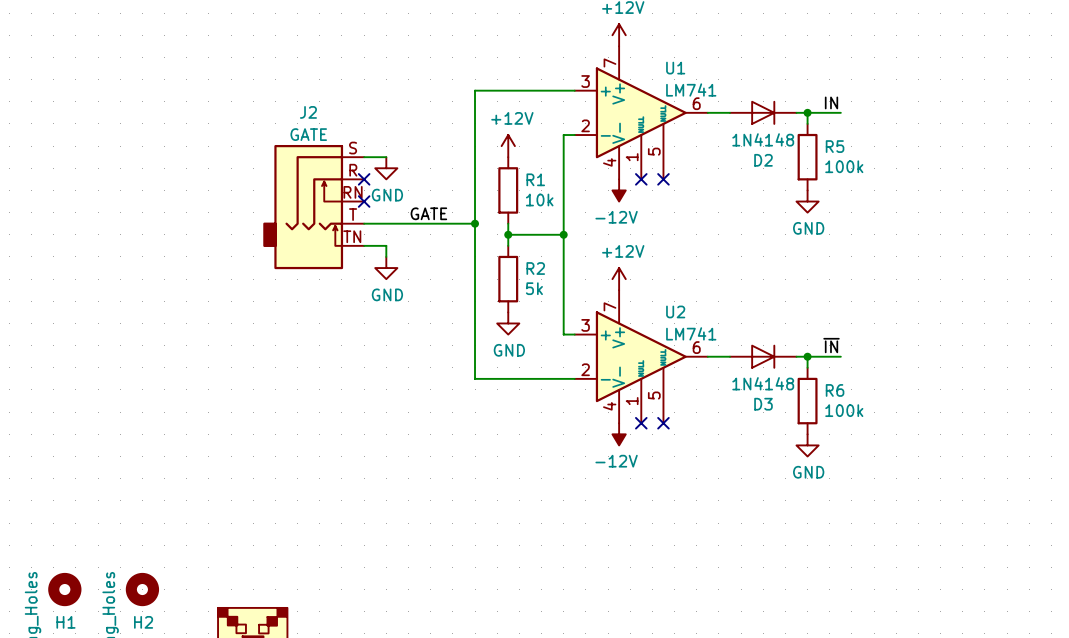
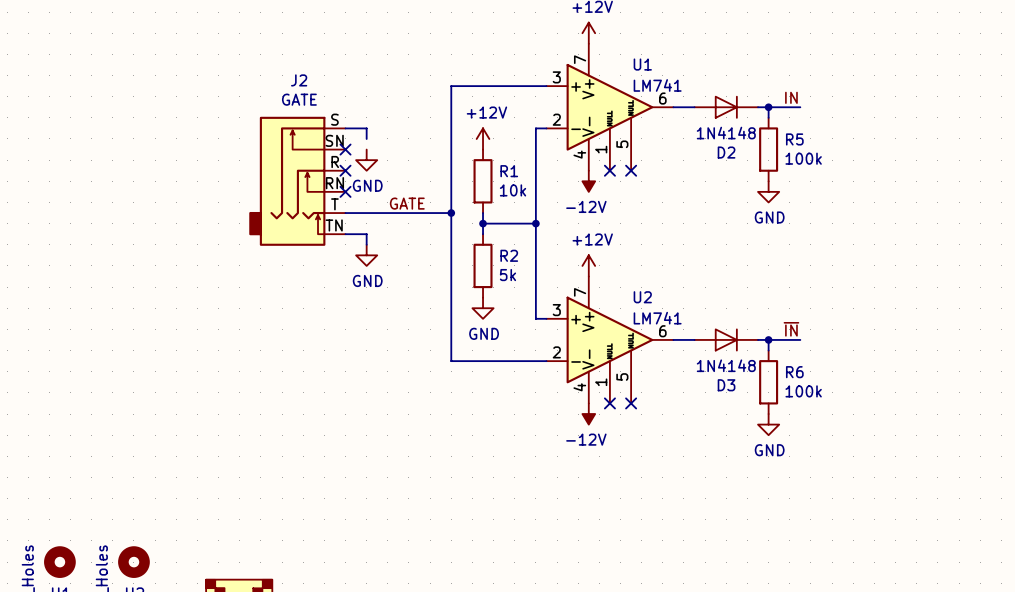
wire: none -> (345, 128) (366, 128) (366, 138)
J2 symbol: [263, 144, 365, 270] -> [249, 116, 346, 246]
wire: (364, 157) (386, 157) -> none
no-connect mark: none -> (345, 149)

